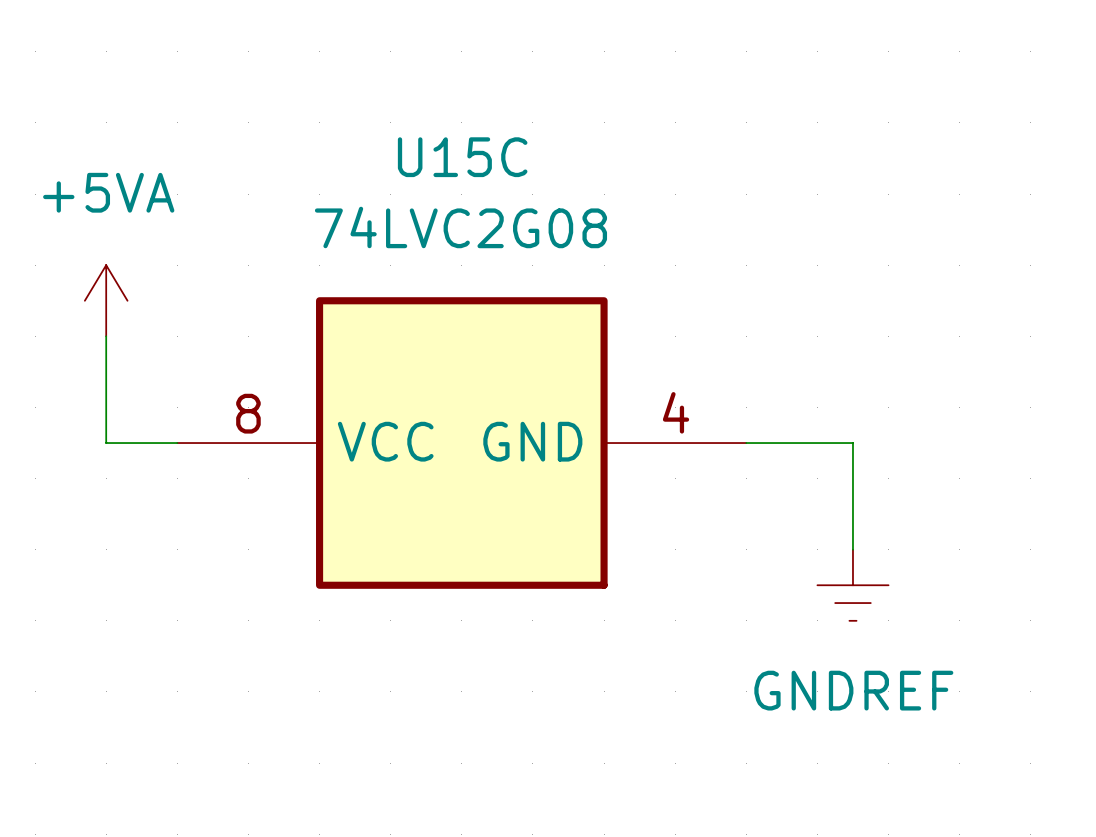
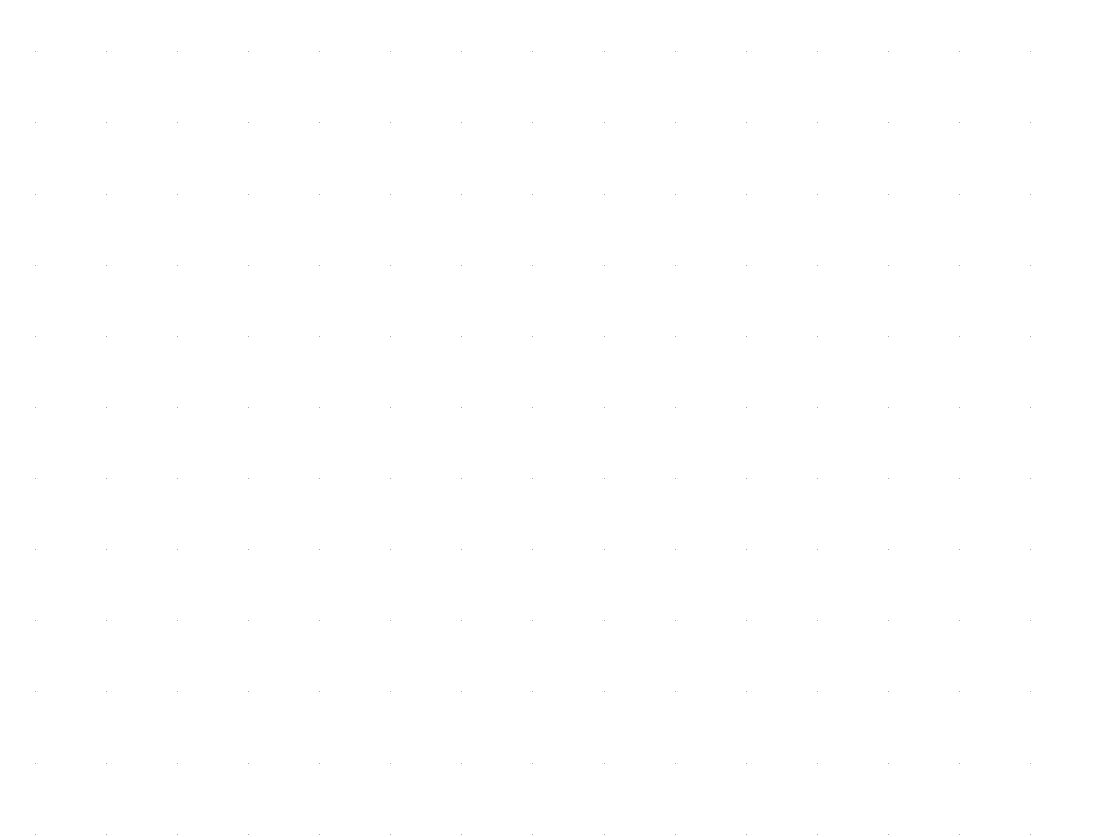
power symbol: +5VA (106, 300) -> none
wire: (106, 336) (106, 443) (177, 443) -> none
U15C: 74LVC2G08 (461, 443) -> none
wire: (746, 443) (852, 443) (852, 549) -> none
power symbol: GNDREF (852, 585) -> none

